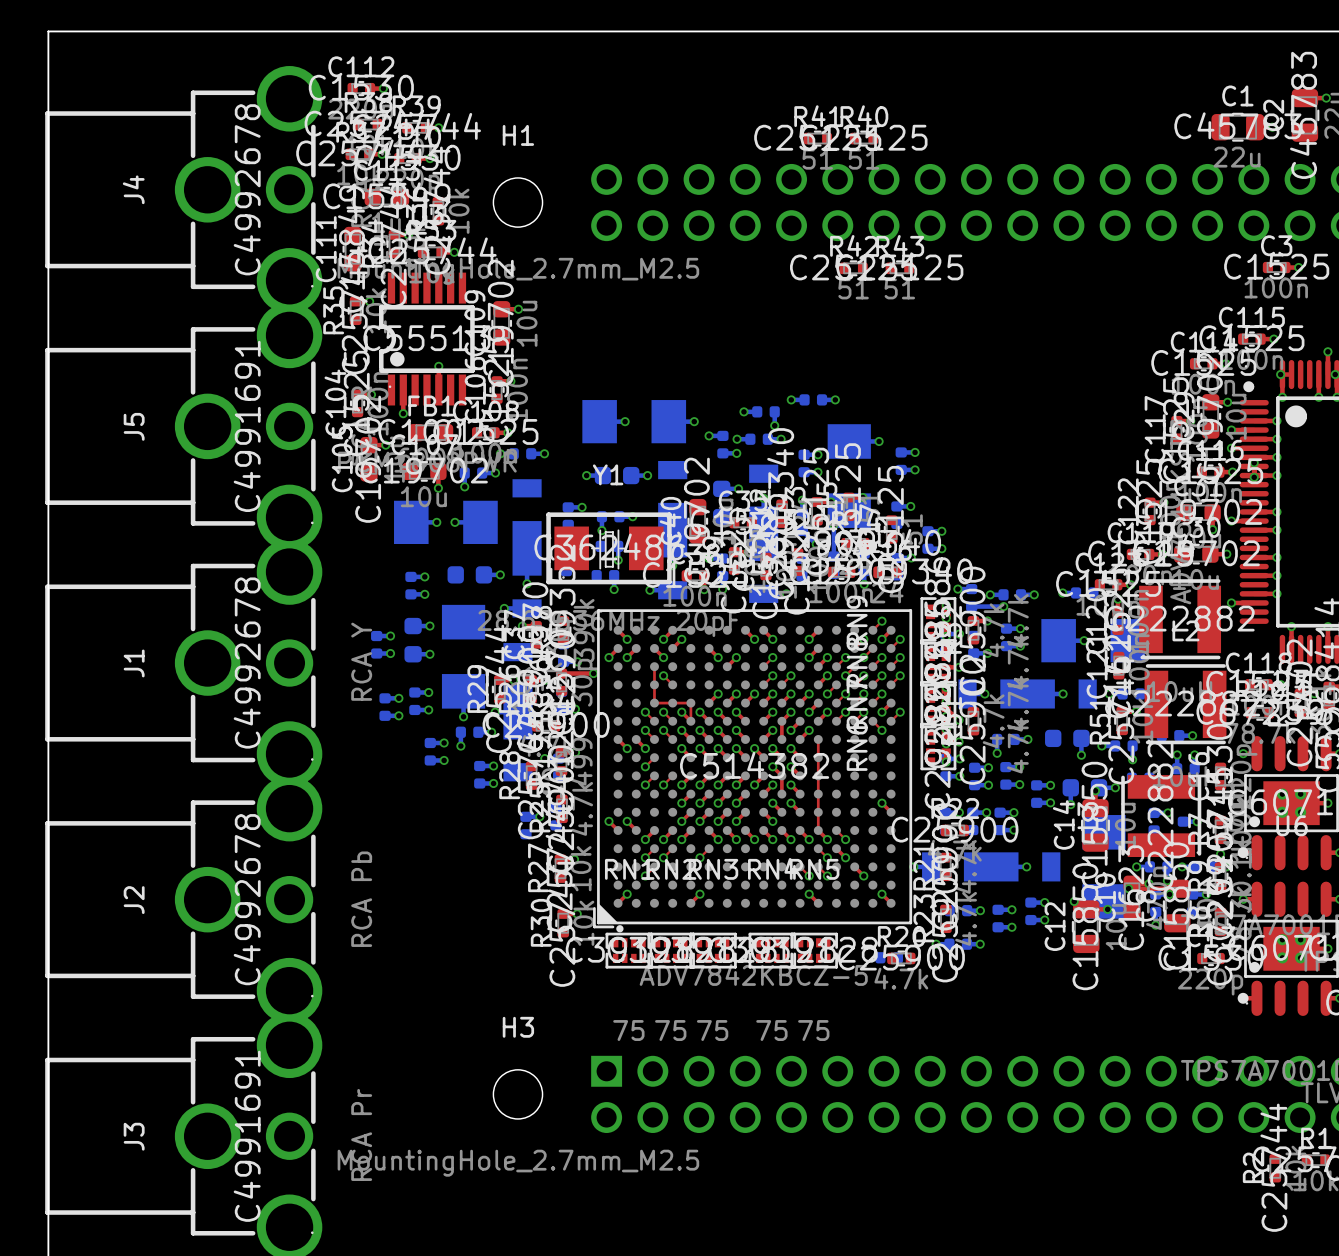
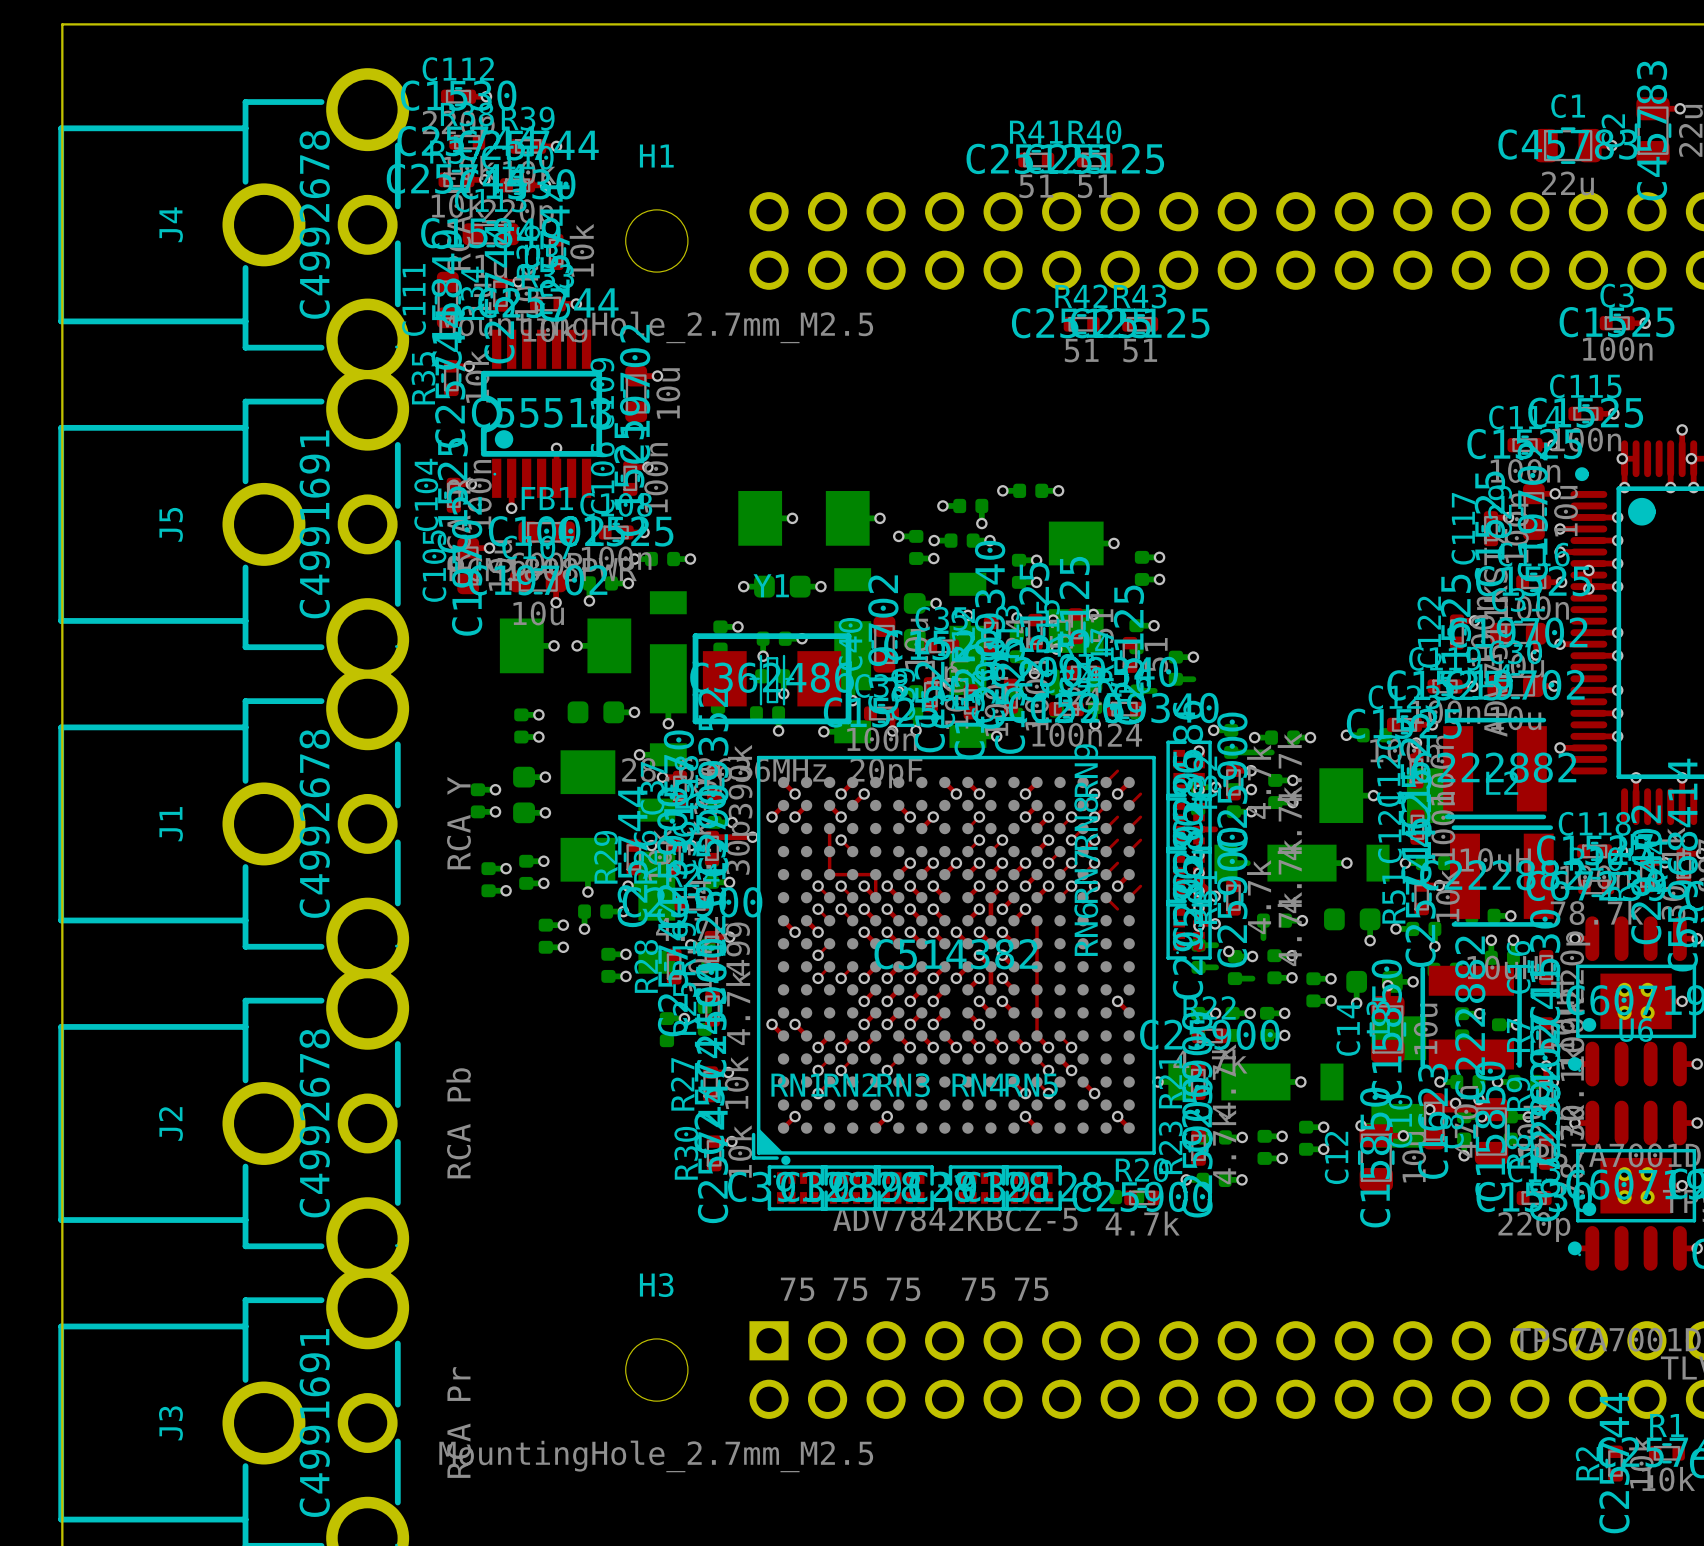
bottom track: (833, 524) (833, 543) -> none
via: (941, 548) -> none
via: (911, 557) -> none
via: (1003, 606) -> none
via: (946, 618) -> none
via: (882, 621) -> none
via: none -> (1251, 789)
via: (900, 639) -> none
via: (882, 657) -> none
via: (900, 657) -> none
via: (959, 667) -> none
via: (882, 675) -> none
via: (900, 675) -> none
via: (882, 693) -> none
via: (984, 693) -> none
via: (900, 712) -> none
via: (882, 730) -> none
via: (997, 753) -> none
via: (959, 758) -> none
via: (946, 762) -> none
via: none -> (1228, 951)
via: (959, 776) -> none
via: (988, 785) -> none

